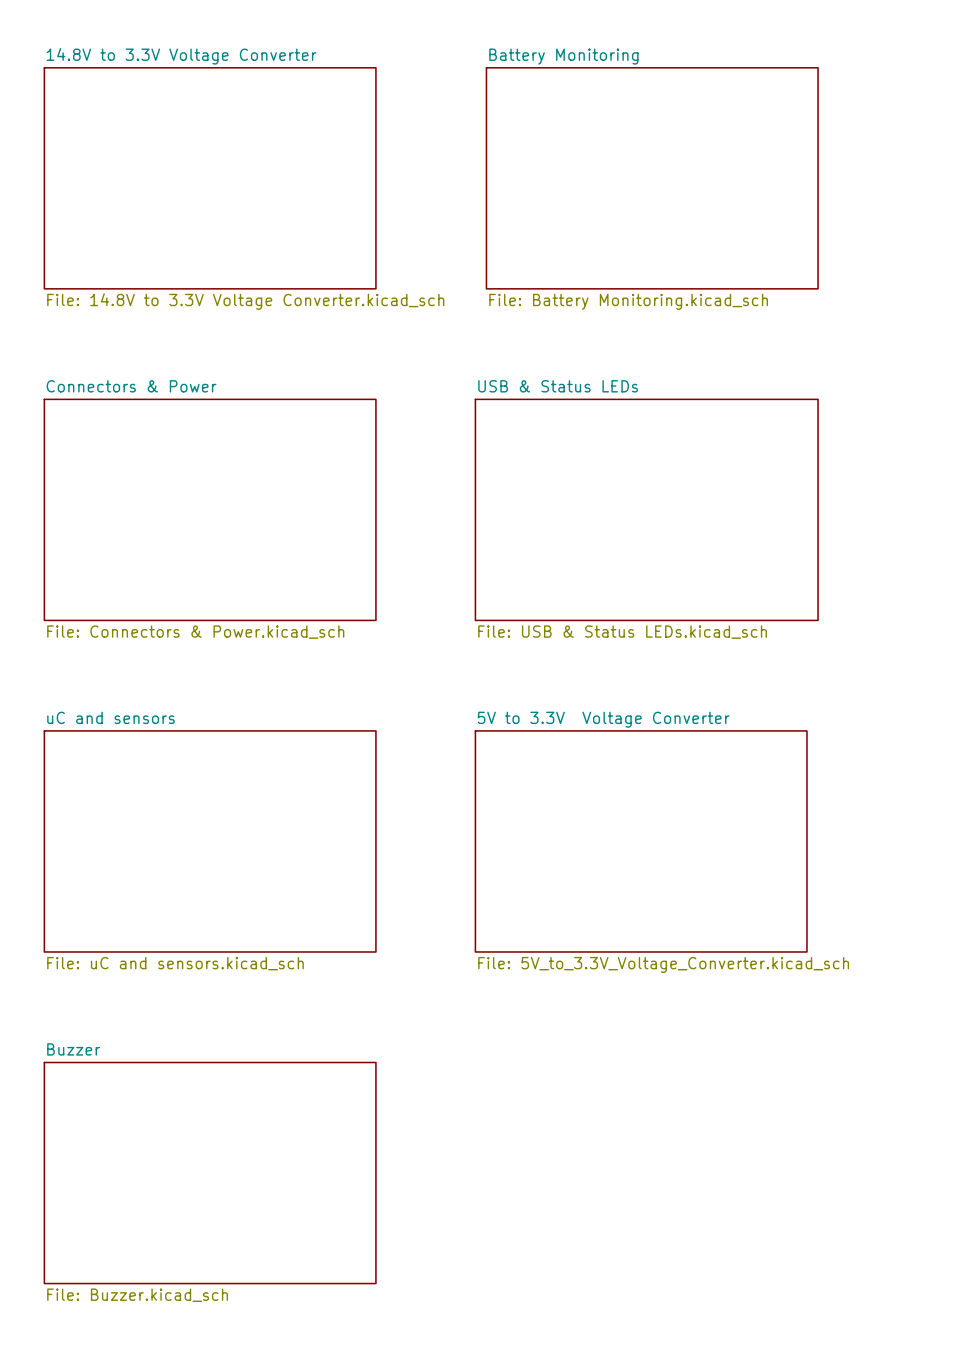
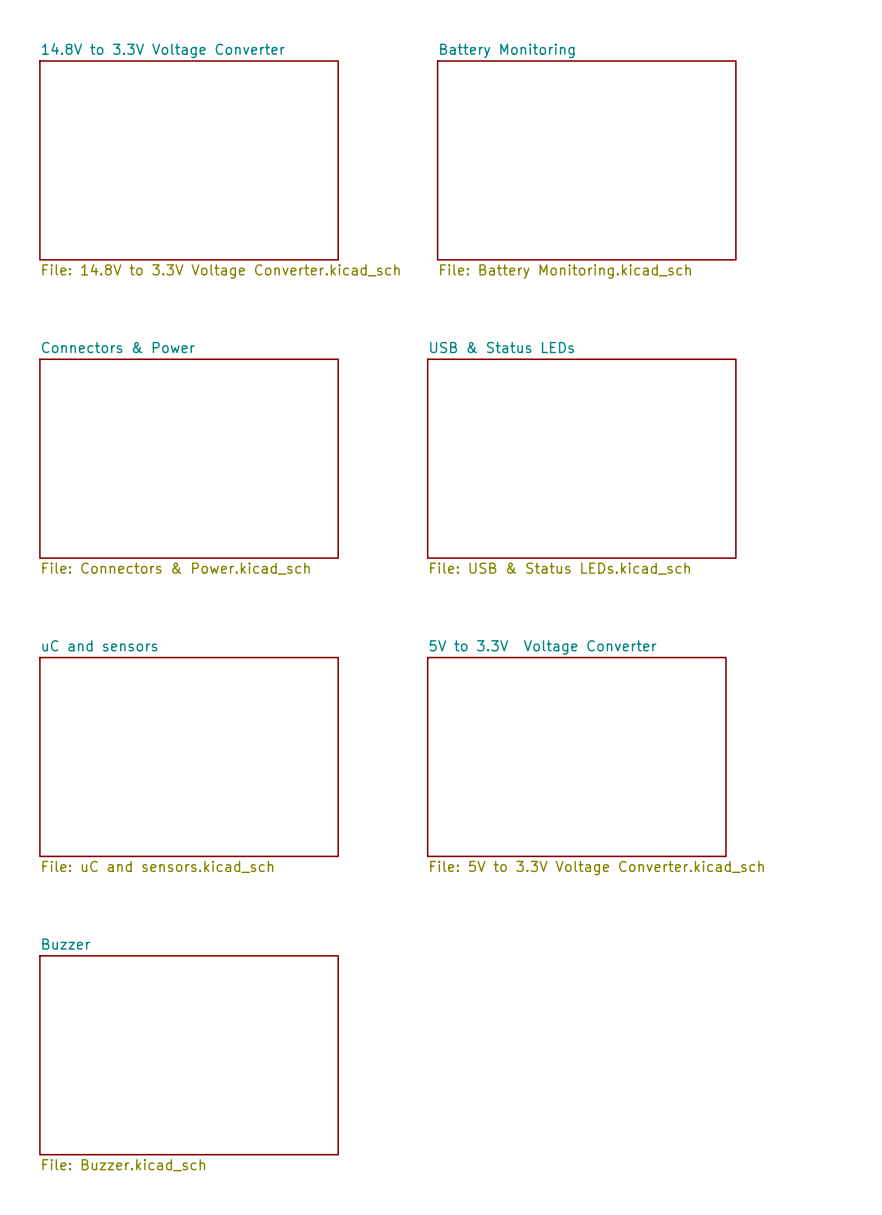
sheet 5V to 3.3V Voltage Converter value: File: 5V_to_3.3V_Voltage_Converter.kicad_sch (663, 964) -> File: 5V to 3.3V Voltage Converter.kicad_sch (597, 868)

